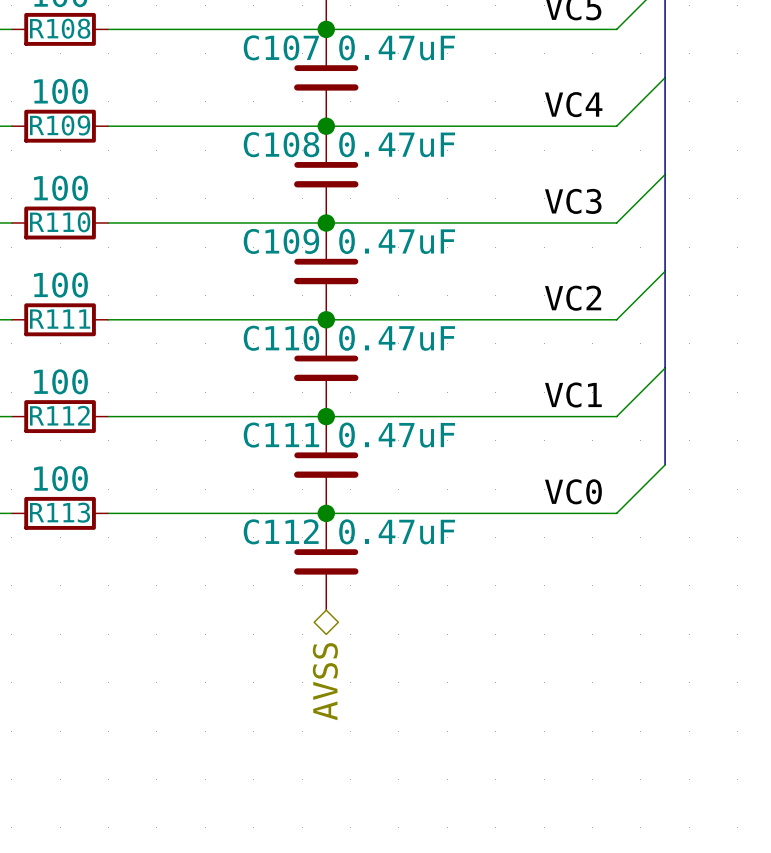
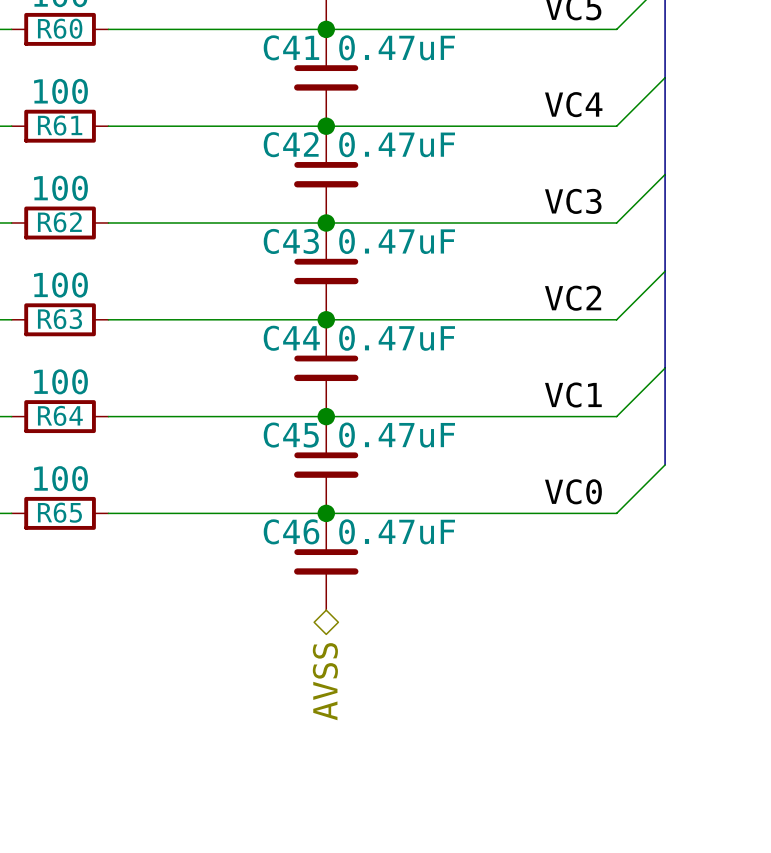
R108 name: R108 (60, 28) -> R60 (60, 28)
C107 name: C107 (281, 47) -> C41 (291, 47)
R109 name: R109 (60, 125) -> R61 (60, 125)
C108 name: C108 (281, 144) -> C42 (291, 144)
R110 name: R110 (60, 222) -> R62 (59, 222)
C109 name: C109 (281, 241) -> C43 (291, 241)
R111 name: R111 (60, 319) -> R63 (60, 319)
C110 name: C110 (281, 338) -> C44 (291, 338)
R112 name: R112 (59, 415) -> R64 (60, 415)
C111 name: C111 (281, 435) -> C45 (291, 435)
R113 name: R113 (60, 512) -> R65 (59, 512)
C112 name: C112 (281, 531) -> C46 (291, 531)

